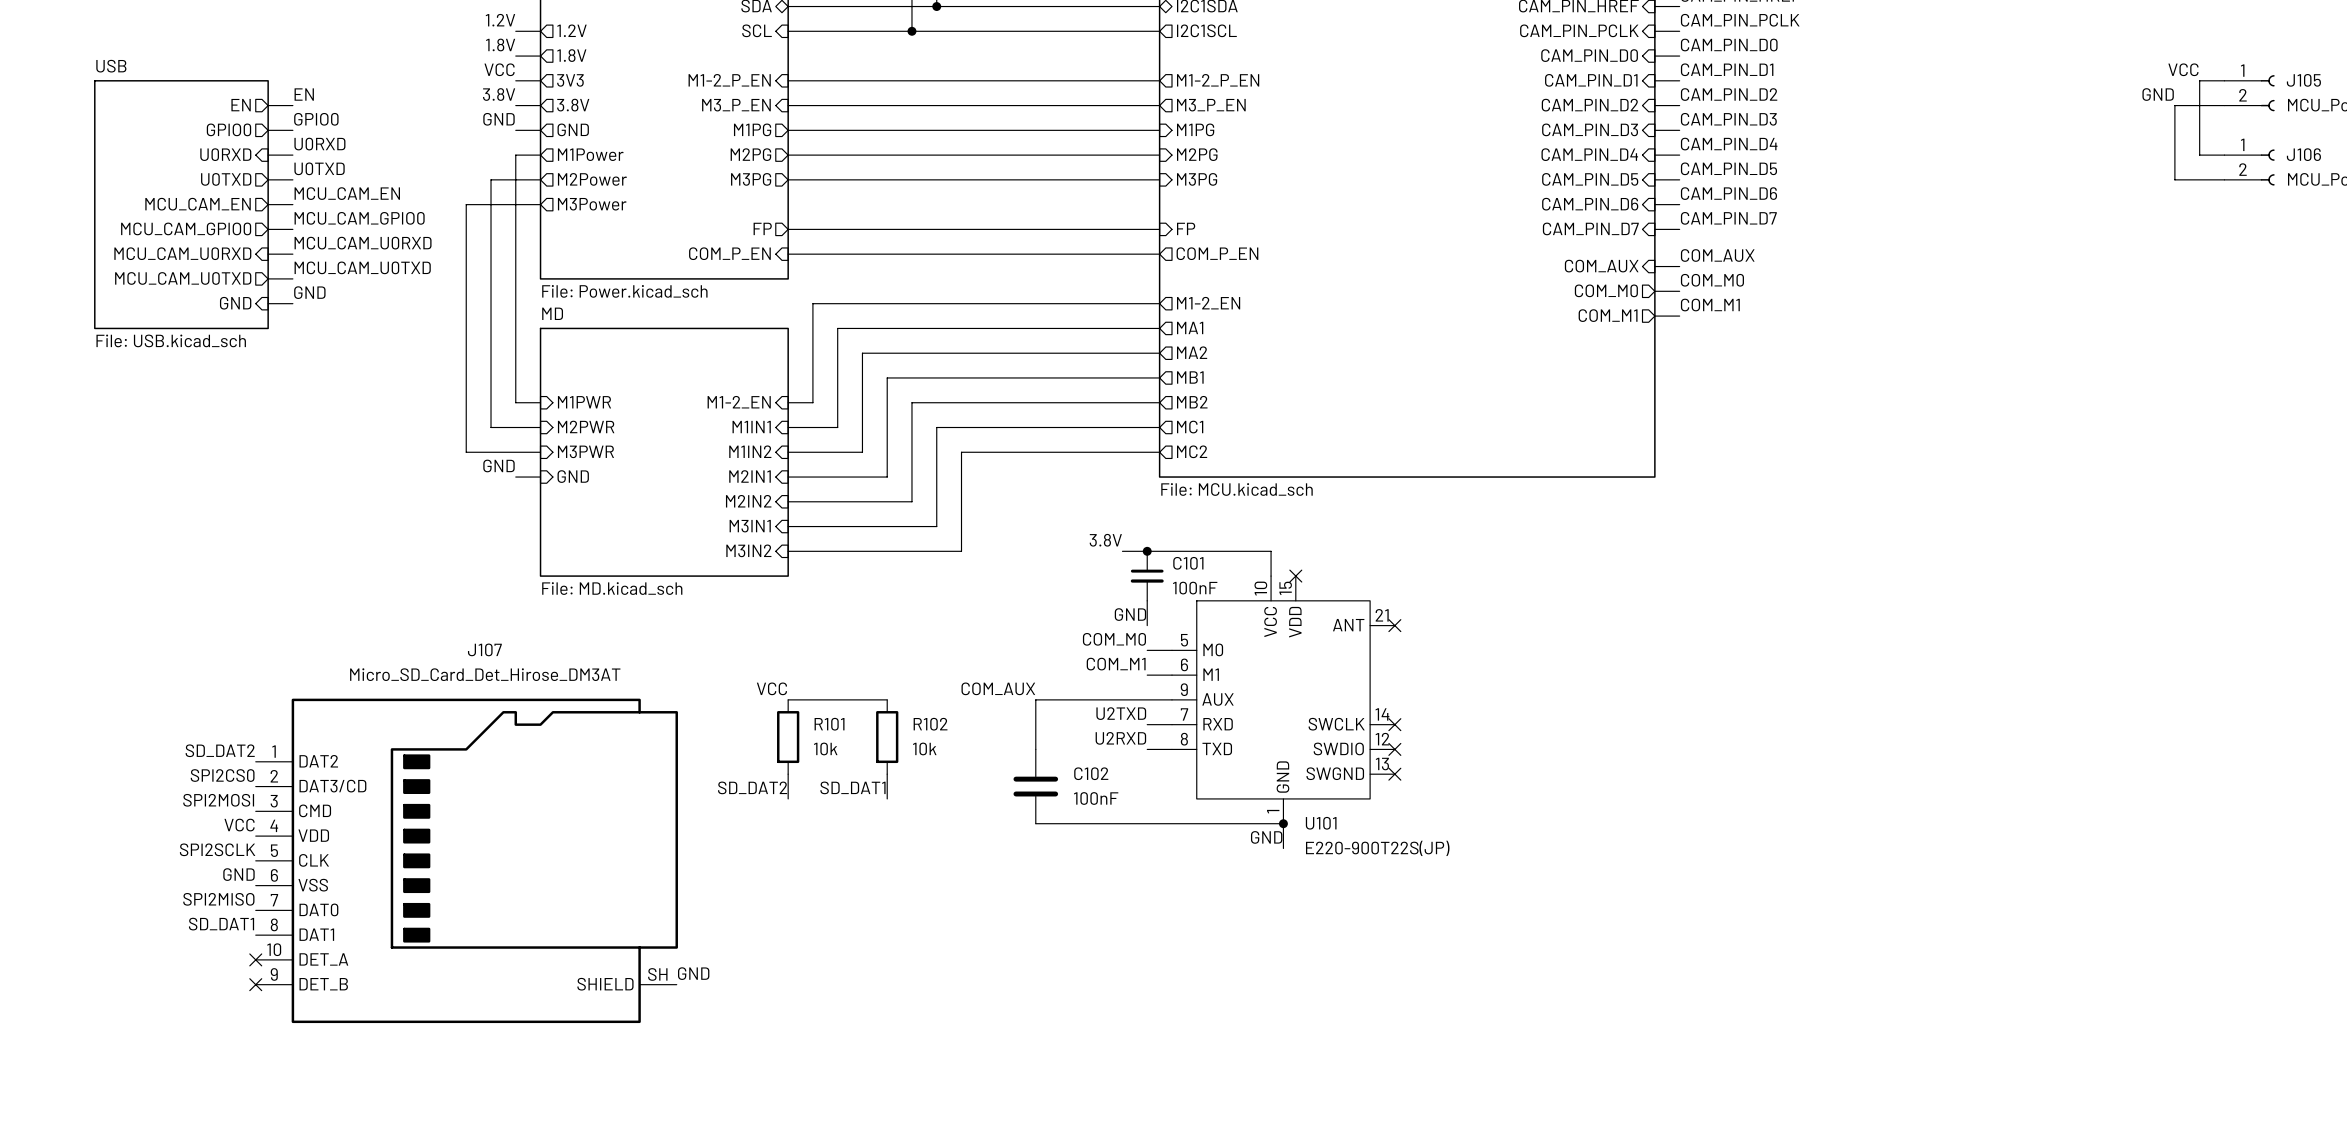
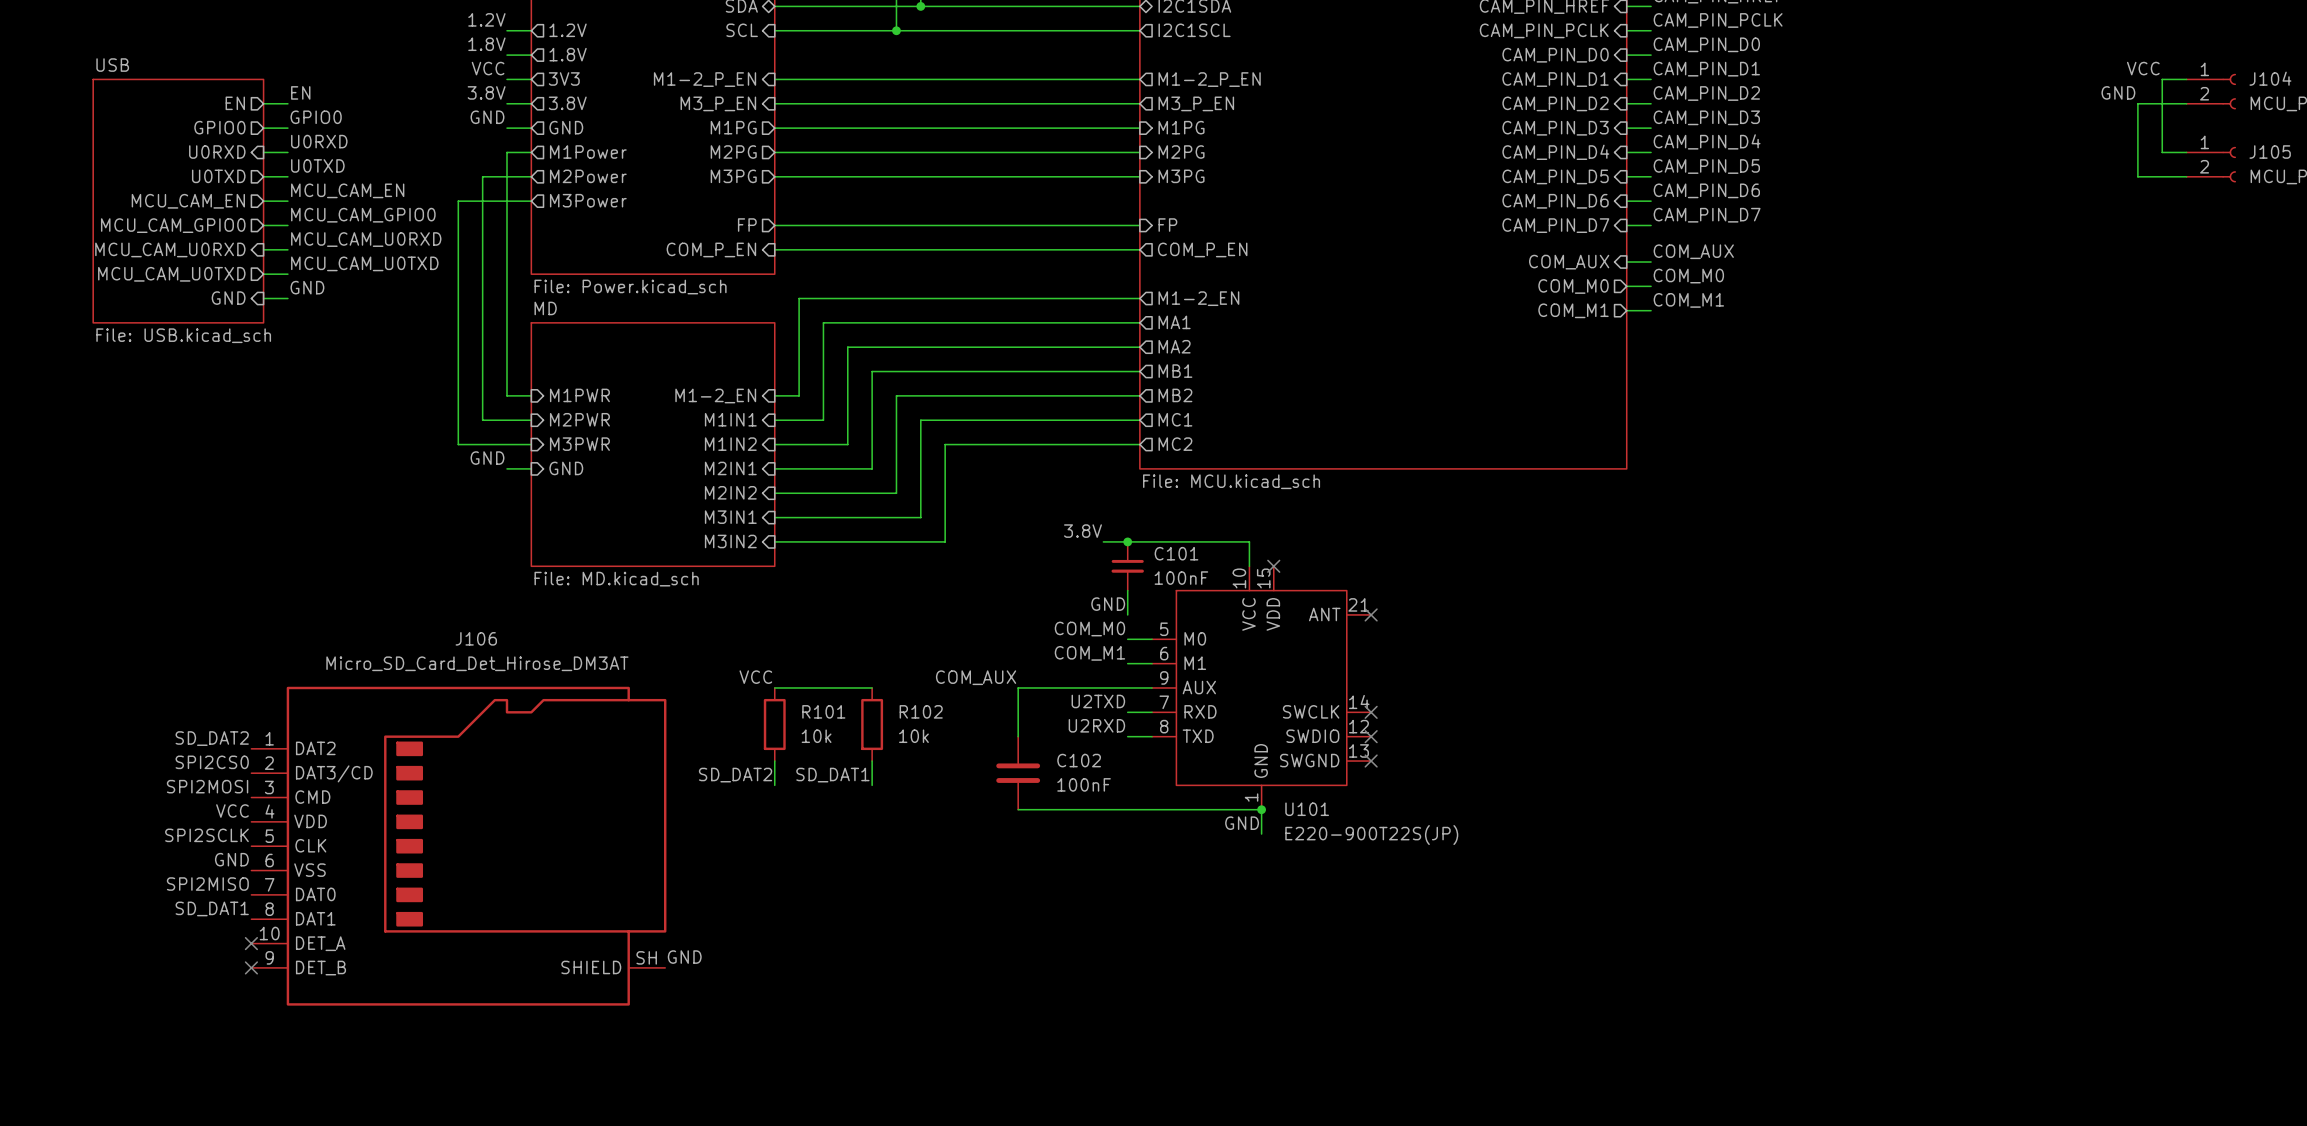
J105 name: J105 (2303, 80) -> J104 (2270, 78)
J106 name: J106 (2303, 154) -> J105 (2270, 152)
J107 name: J107 (484, 649) -> J106 (476, 638)

